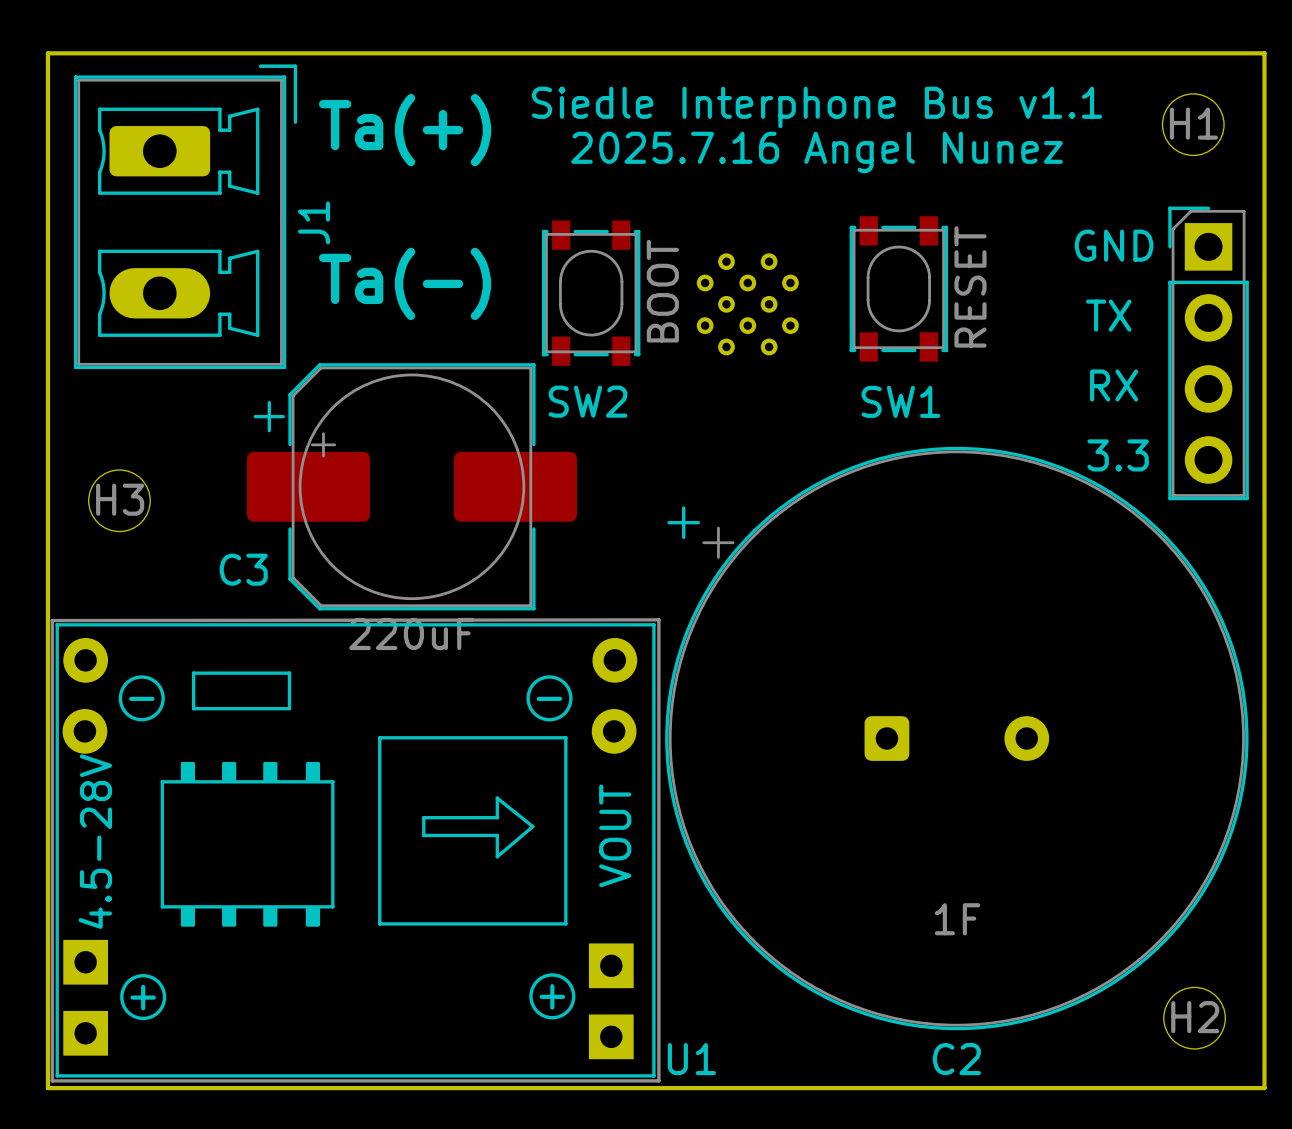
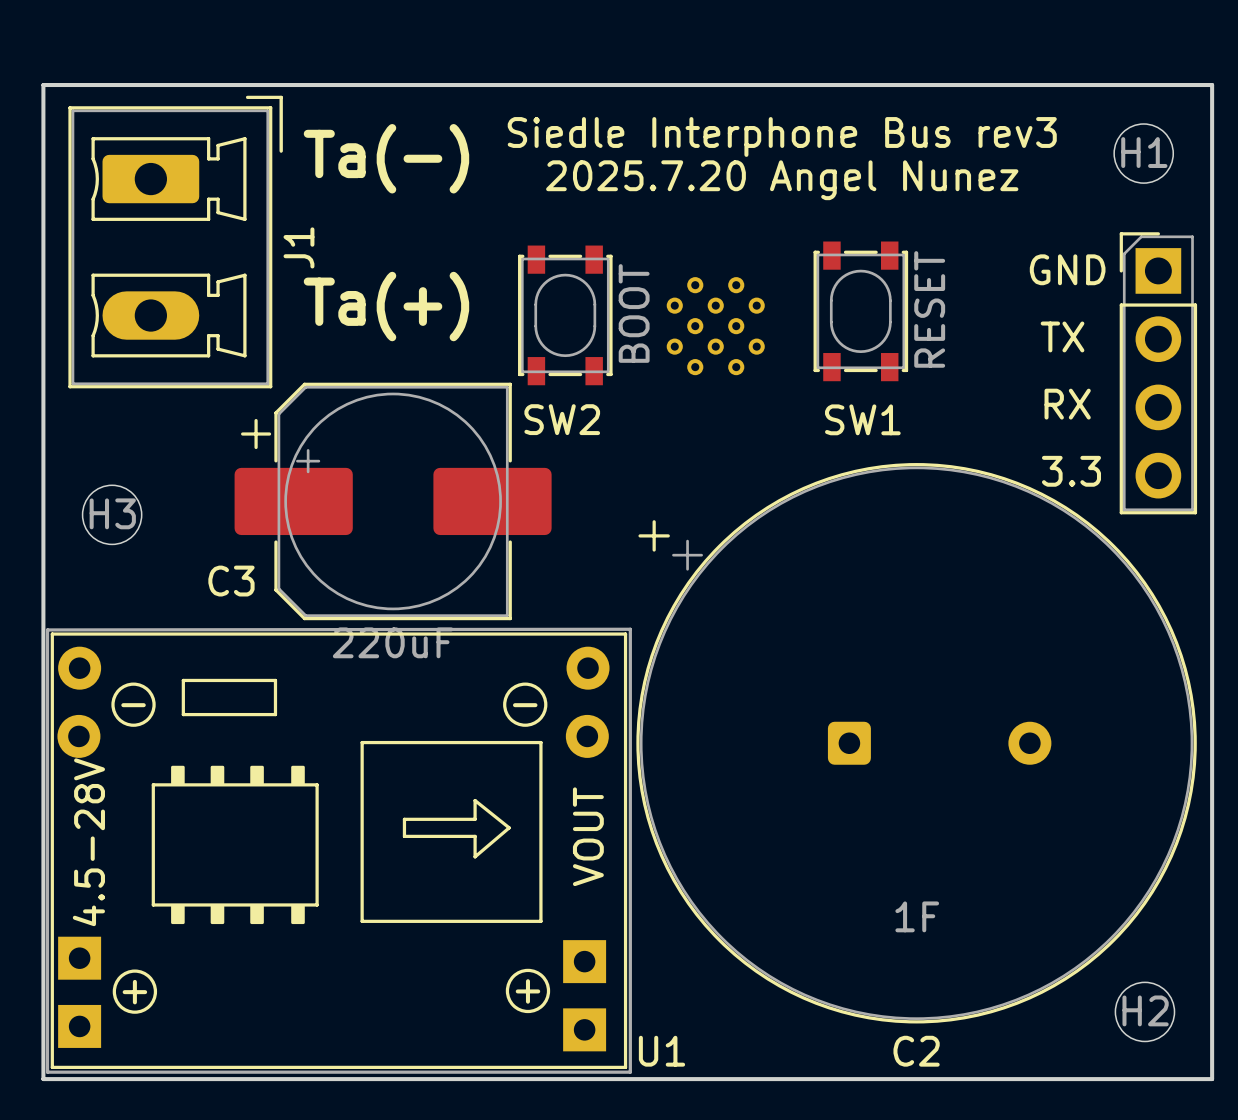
text: Siedle Interphone Bus v1.1 (817, 107) -> Siedle Interphone Bus rev3 (782, 136)
text: Ta(+) (405, 130) -> Ta(-) (386, 158)
text: 2025.7.16 Angel Nunez (817, 152) -> 2025.7.20 Angel Nunez (782, 180)
text: Ta(-) (405, 283) -> Ta(+) (386, 306)
C2 footprint: [665, 446, 1249, 1031] -> [636, 463, 1197, 1024]

